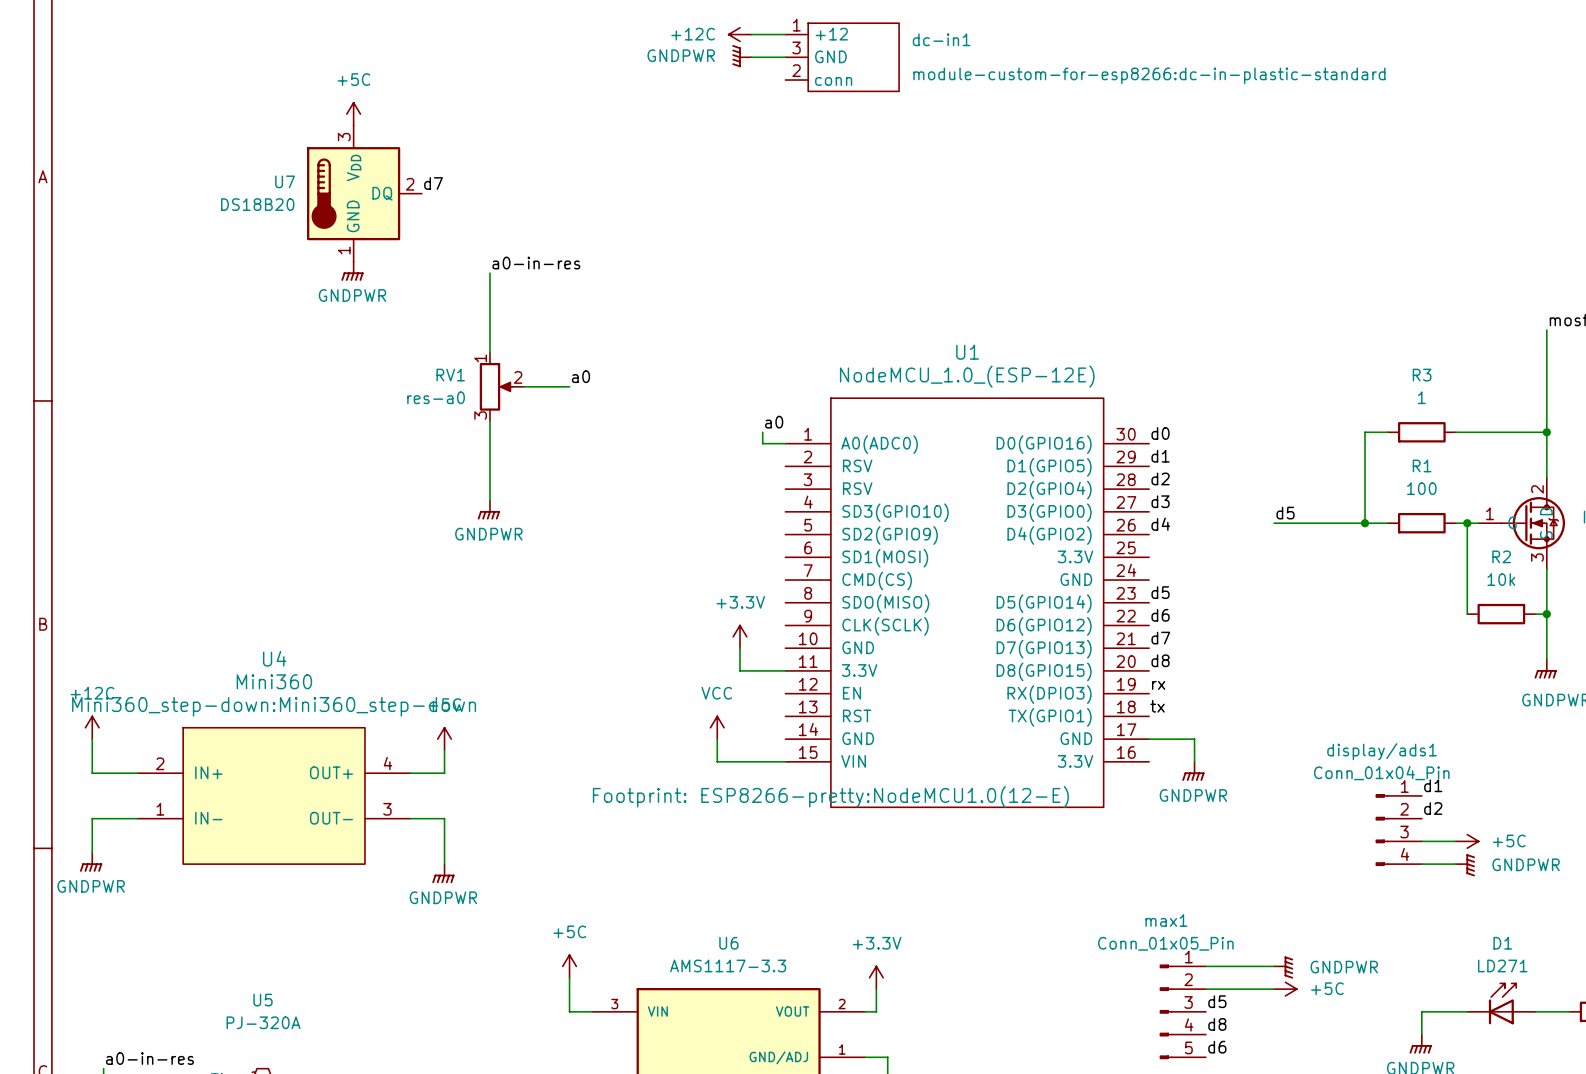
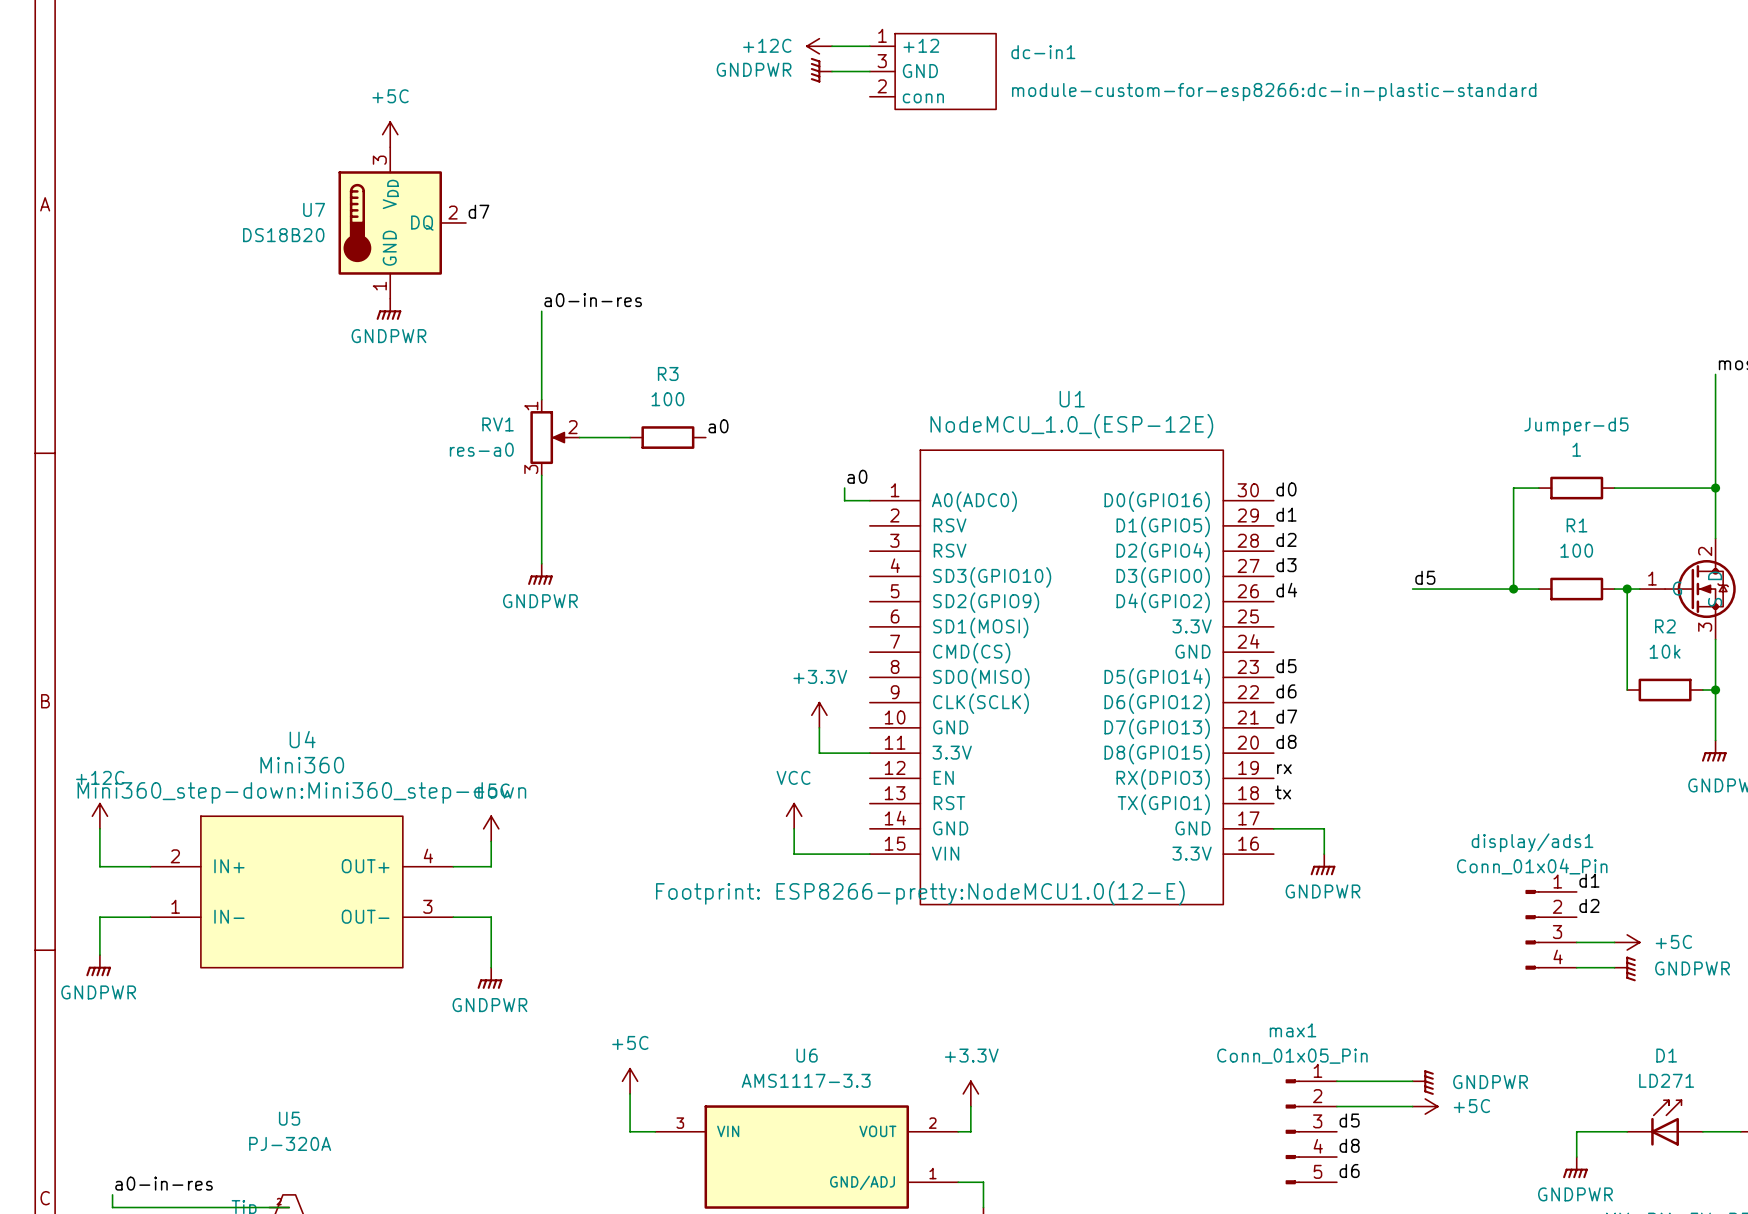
R3 name: R3 (1422, 375) -> Jumper-d5 (1576, 426)
label position: a0 (580, 376) -> a0 (718, 426)
R3: none -> 100 (667, 437)

